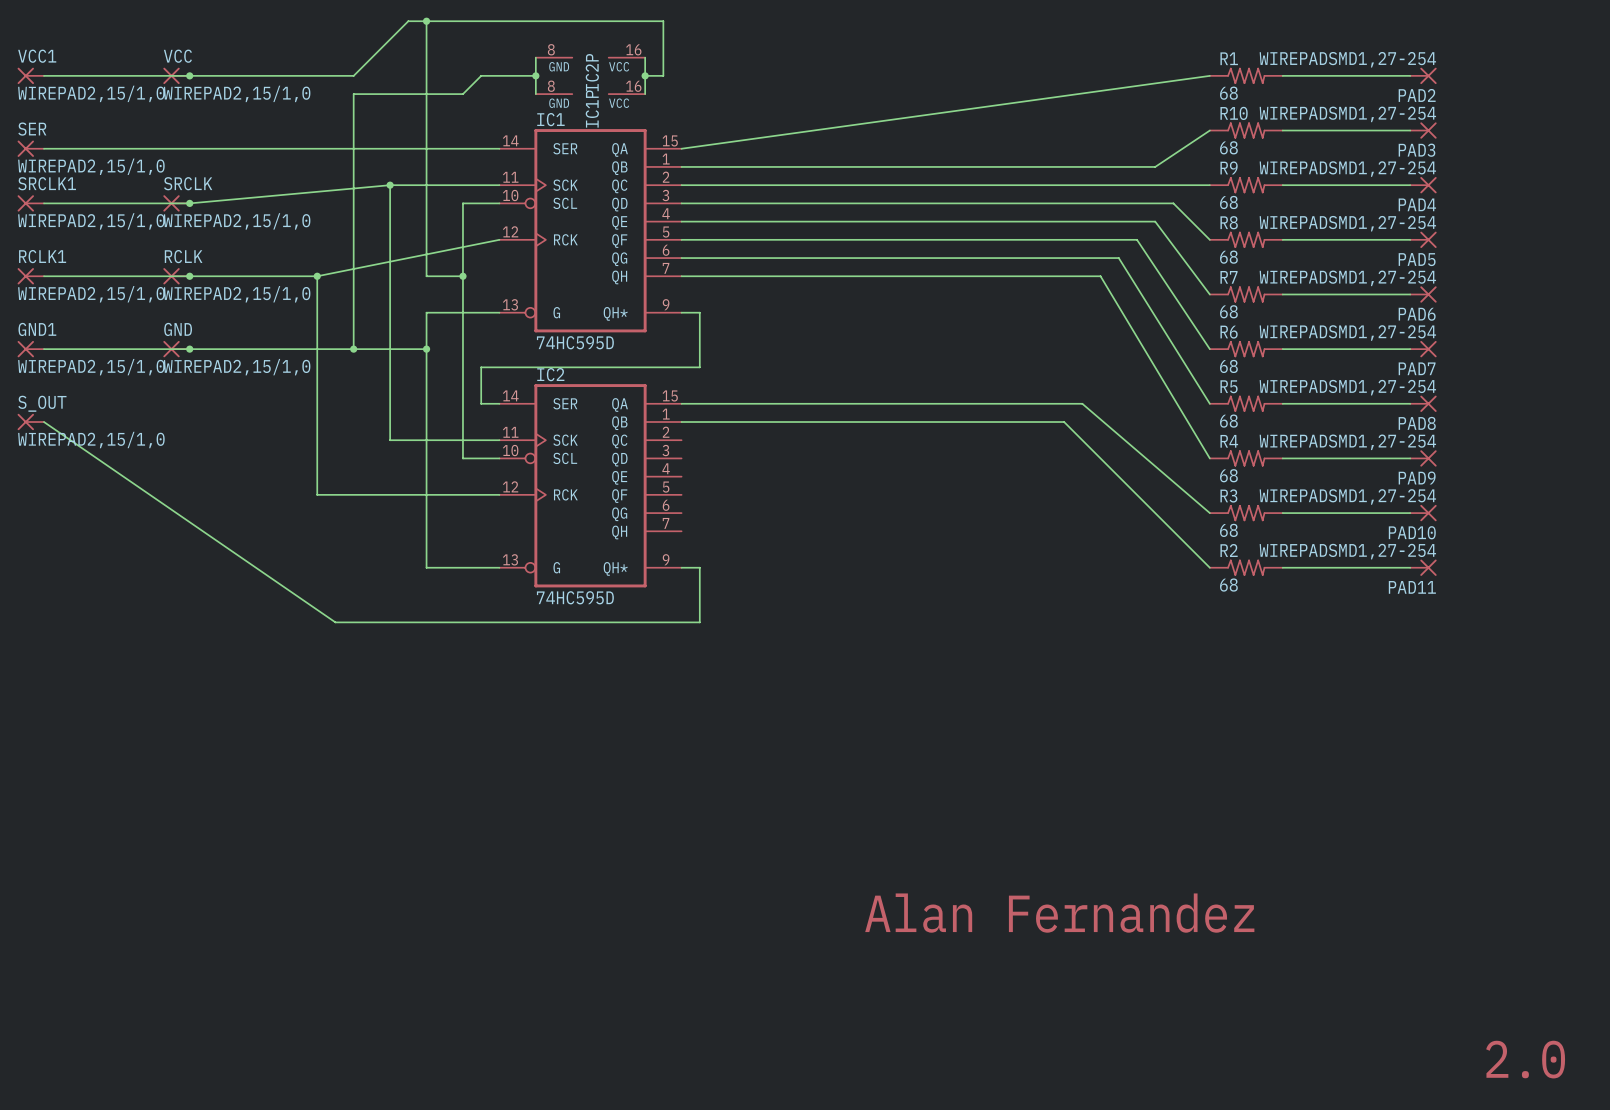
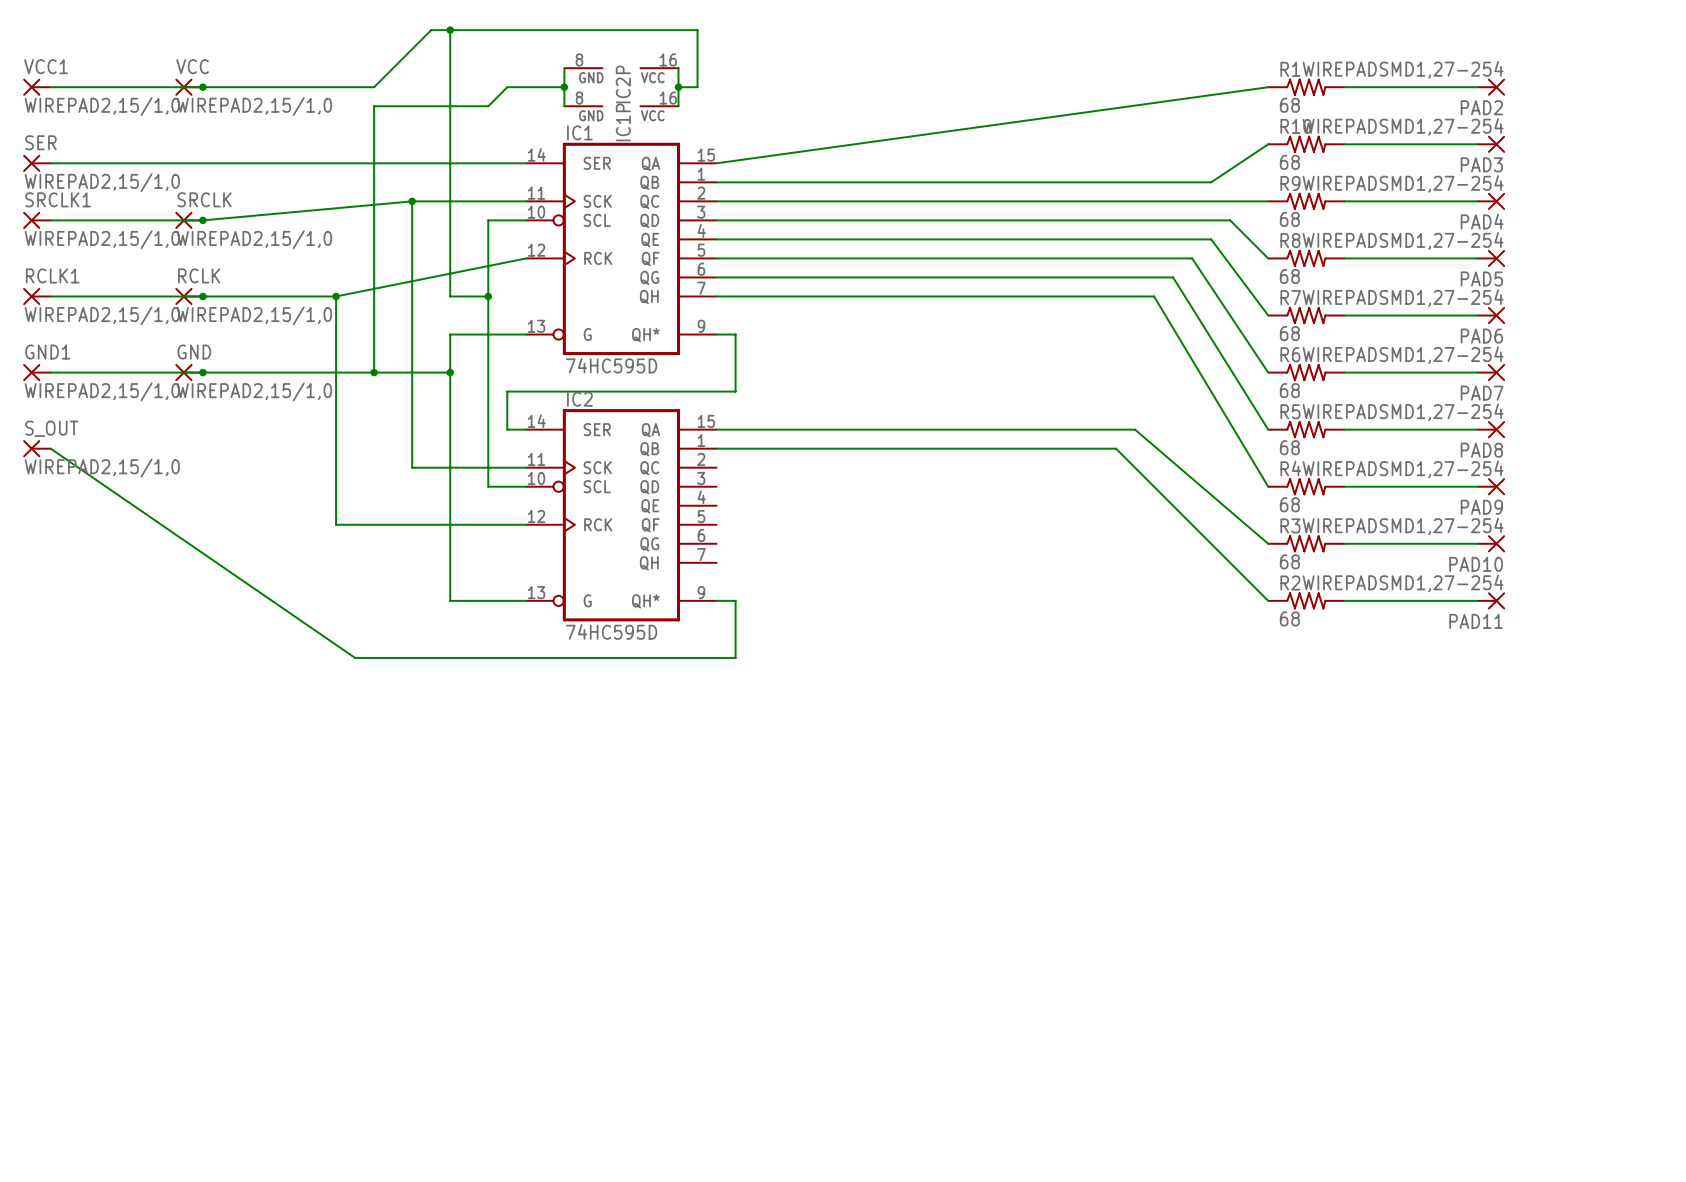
text: Alan Fernandez (1059, 913) -> none
text: 2.0 (1525, 1059) -> none

